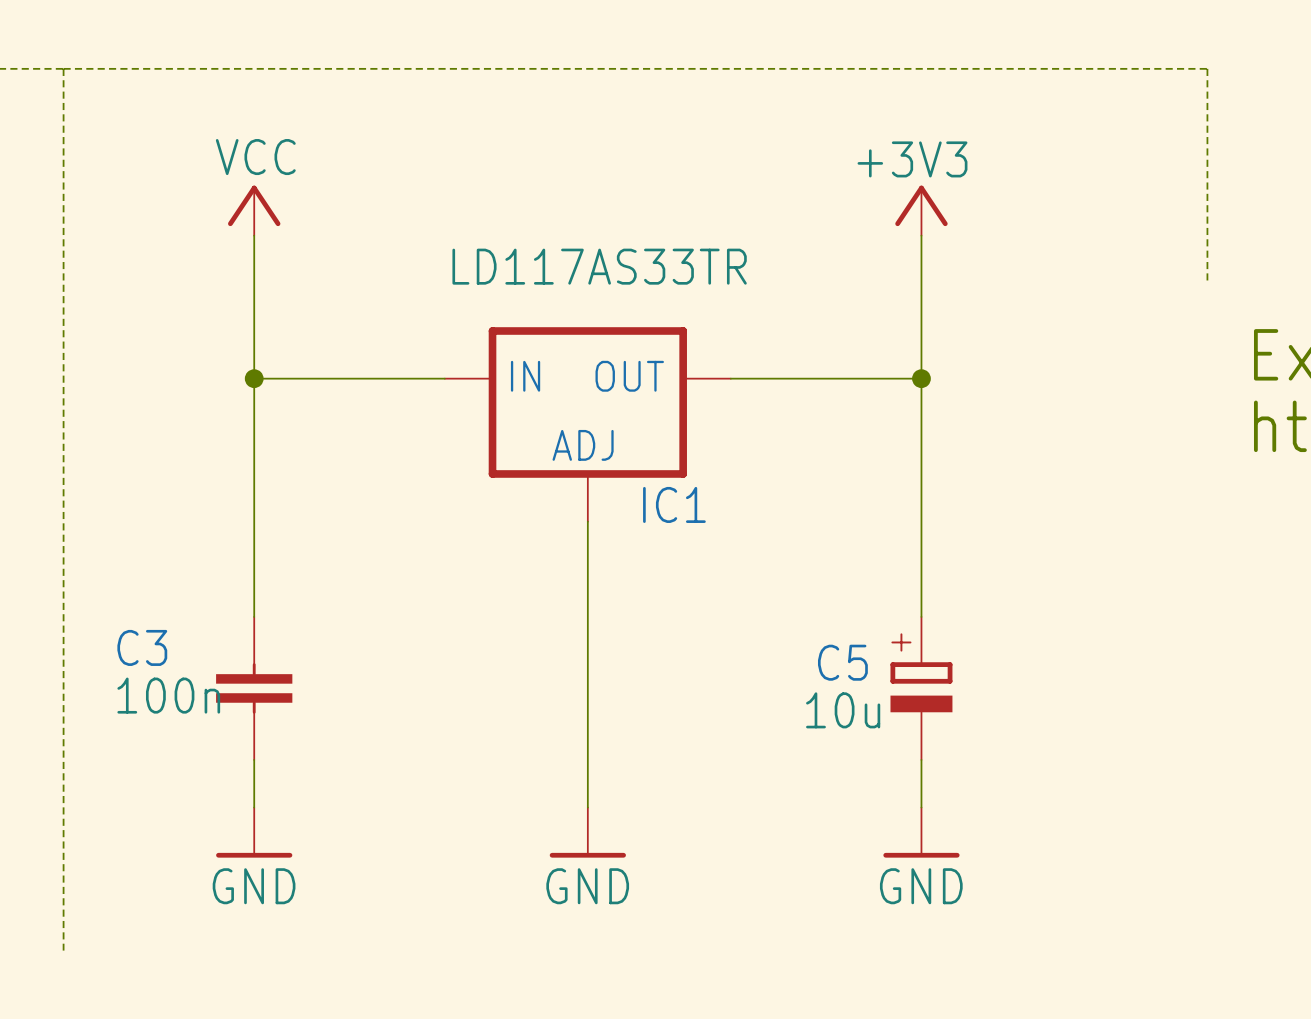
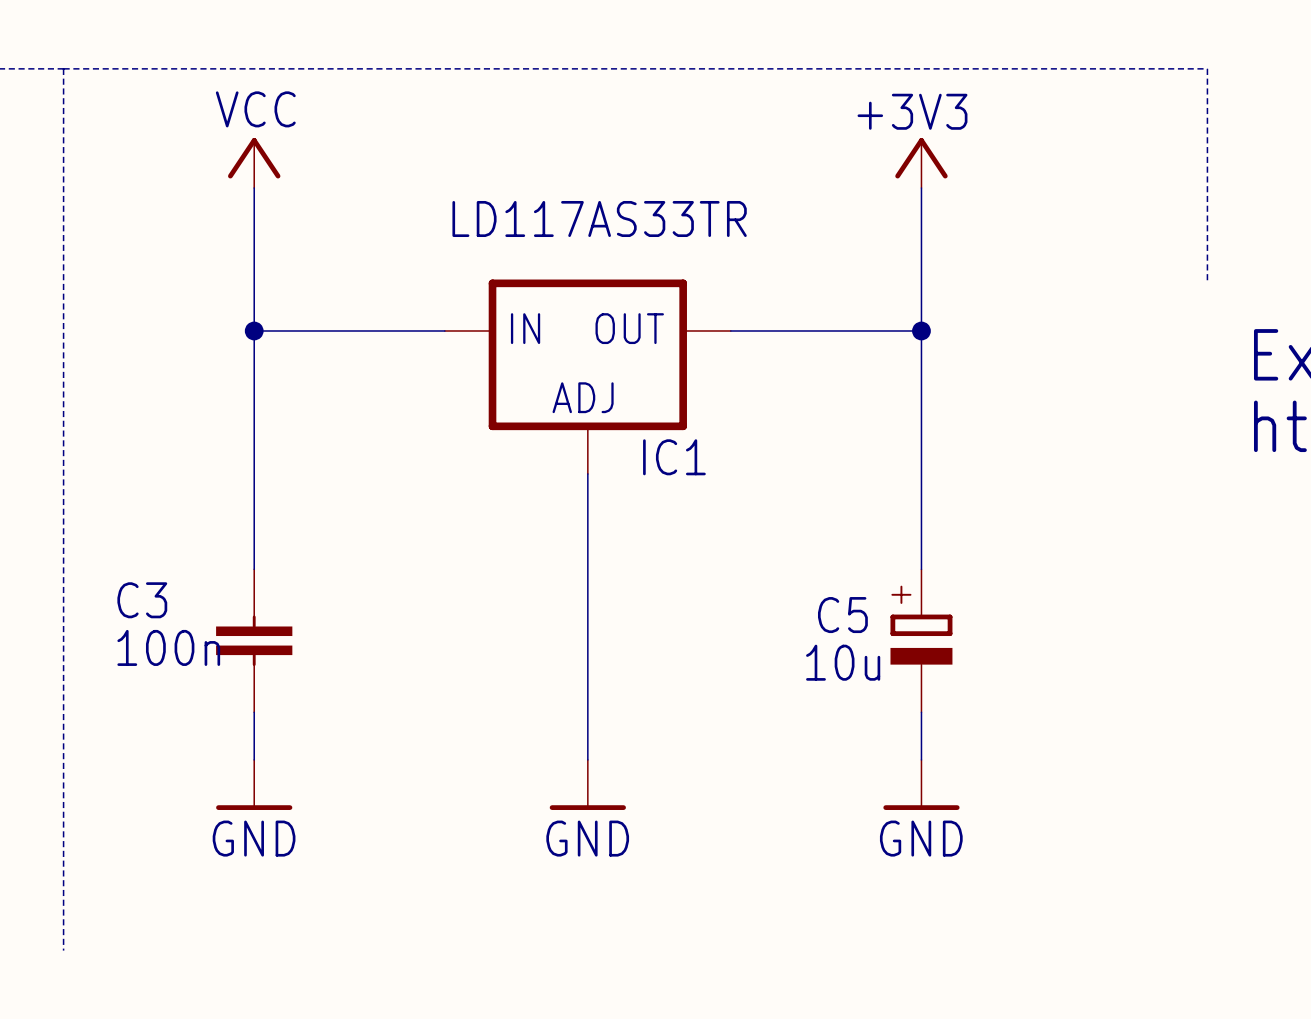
power symbol position: VCC (254, 210) -> VCC (254, 162)
power symbol position: +3V3 (921, 210) -> +3V3 (921, 162)
wire: (254, 378) (444, 378) -> (254, 330) (444, 330)
junction position: (254, 378) -> (254, 330)
wire: (730, 378) (921, 378) -> (730, 330) (921, 330)
junction position: (921, 378) -> (921, 330)
IC1 position: (587, 424) -> (587, 376)
C3 position: (254, 688) -> (254, 640)
C5 position: (921, 688) -> (921, 640)
power symbol position: GND (254, 832) -> GND (254, 784)
power symbol position: GND (587, 832) -> GND (587, 784)
power symbol position: GND (921, 832) -> GND (921, 784)

